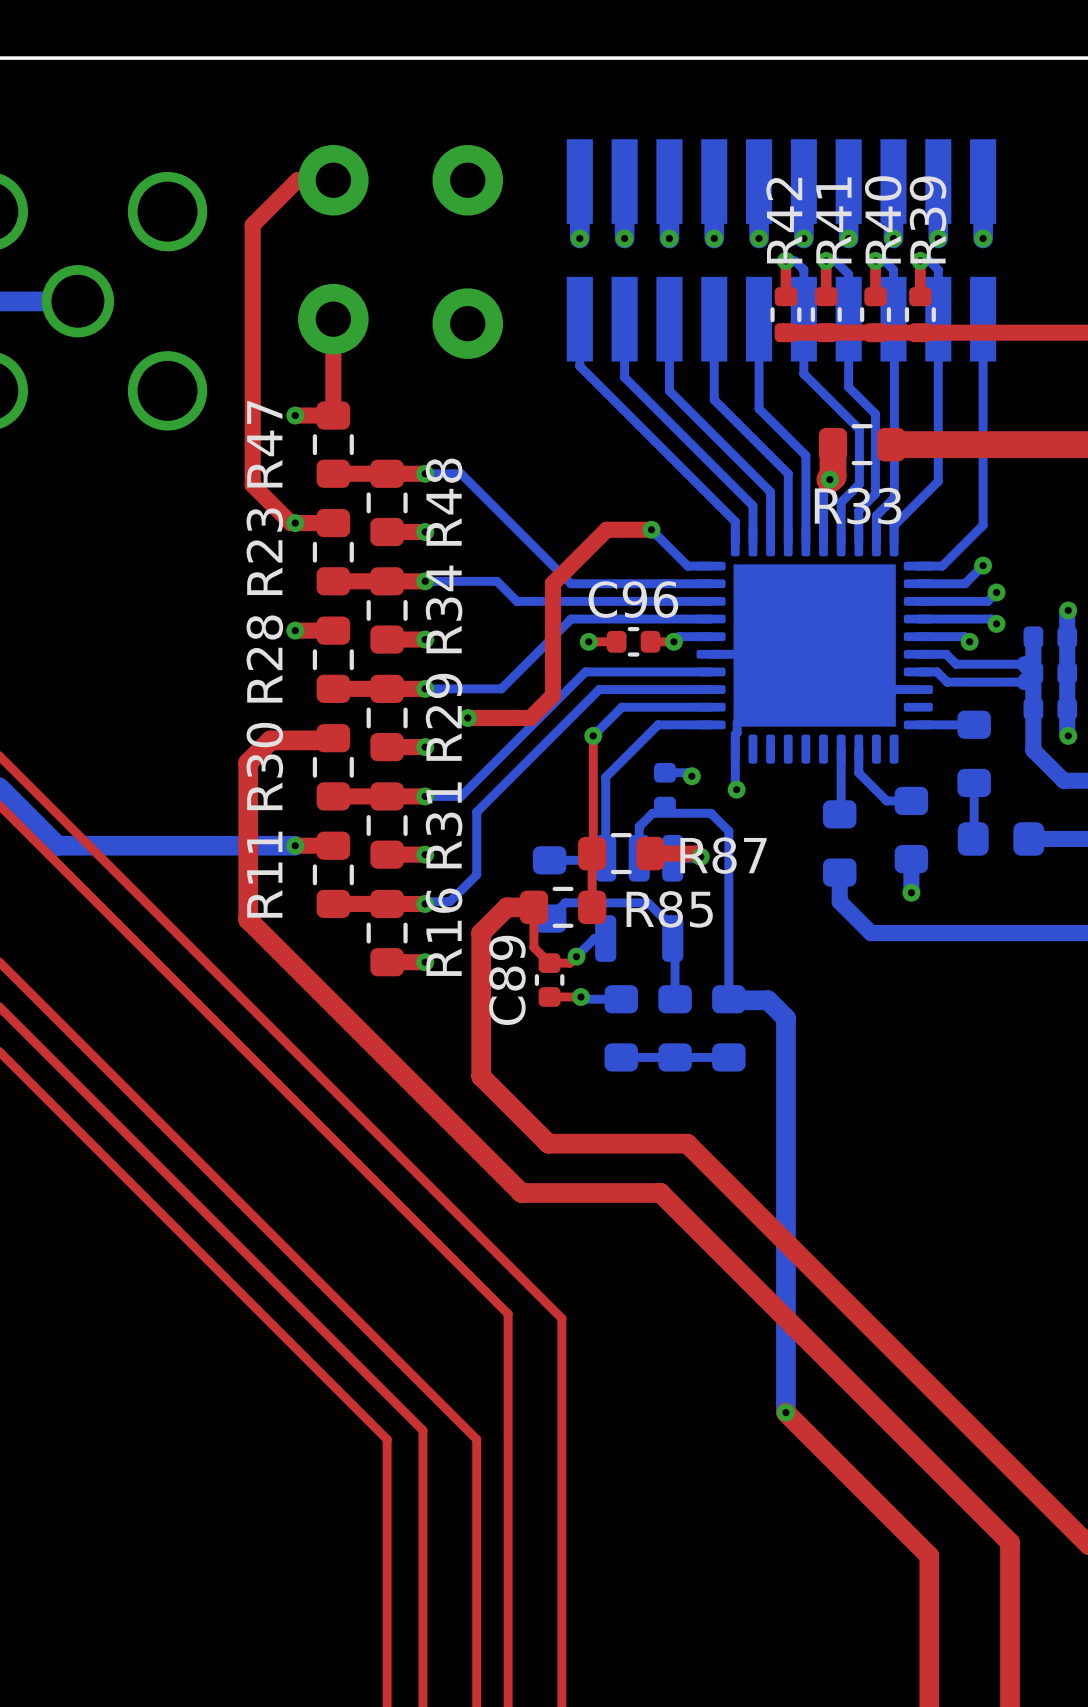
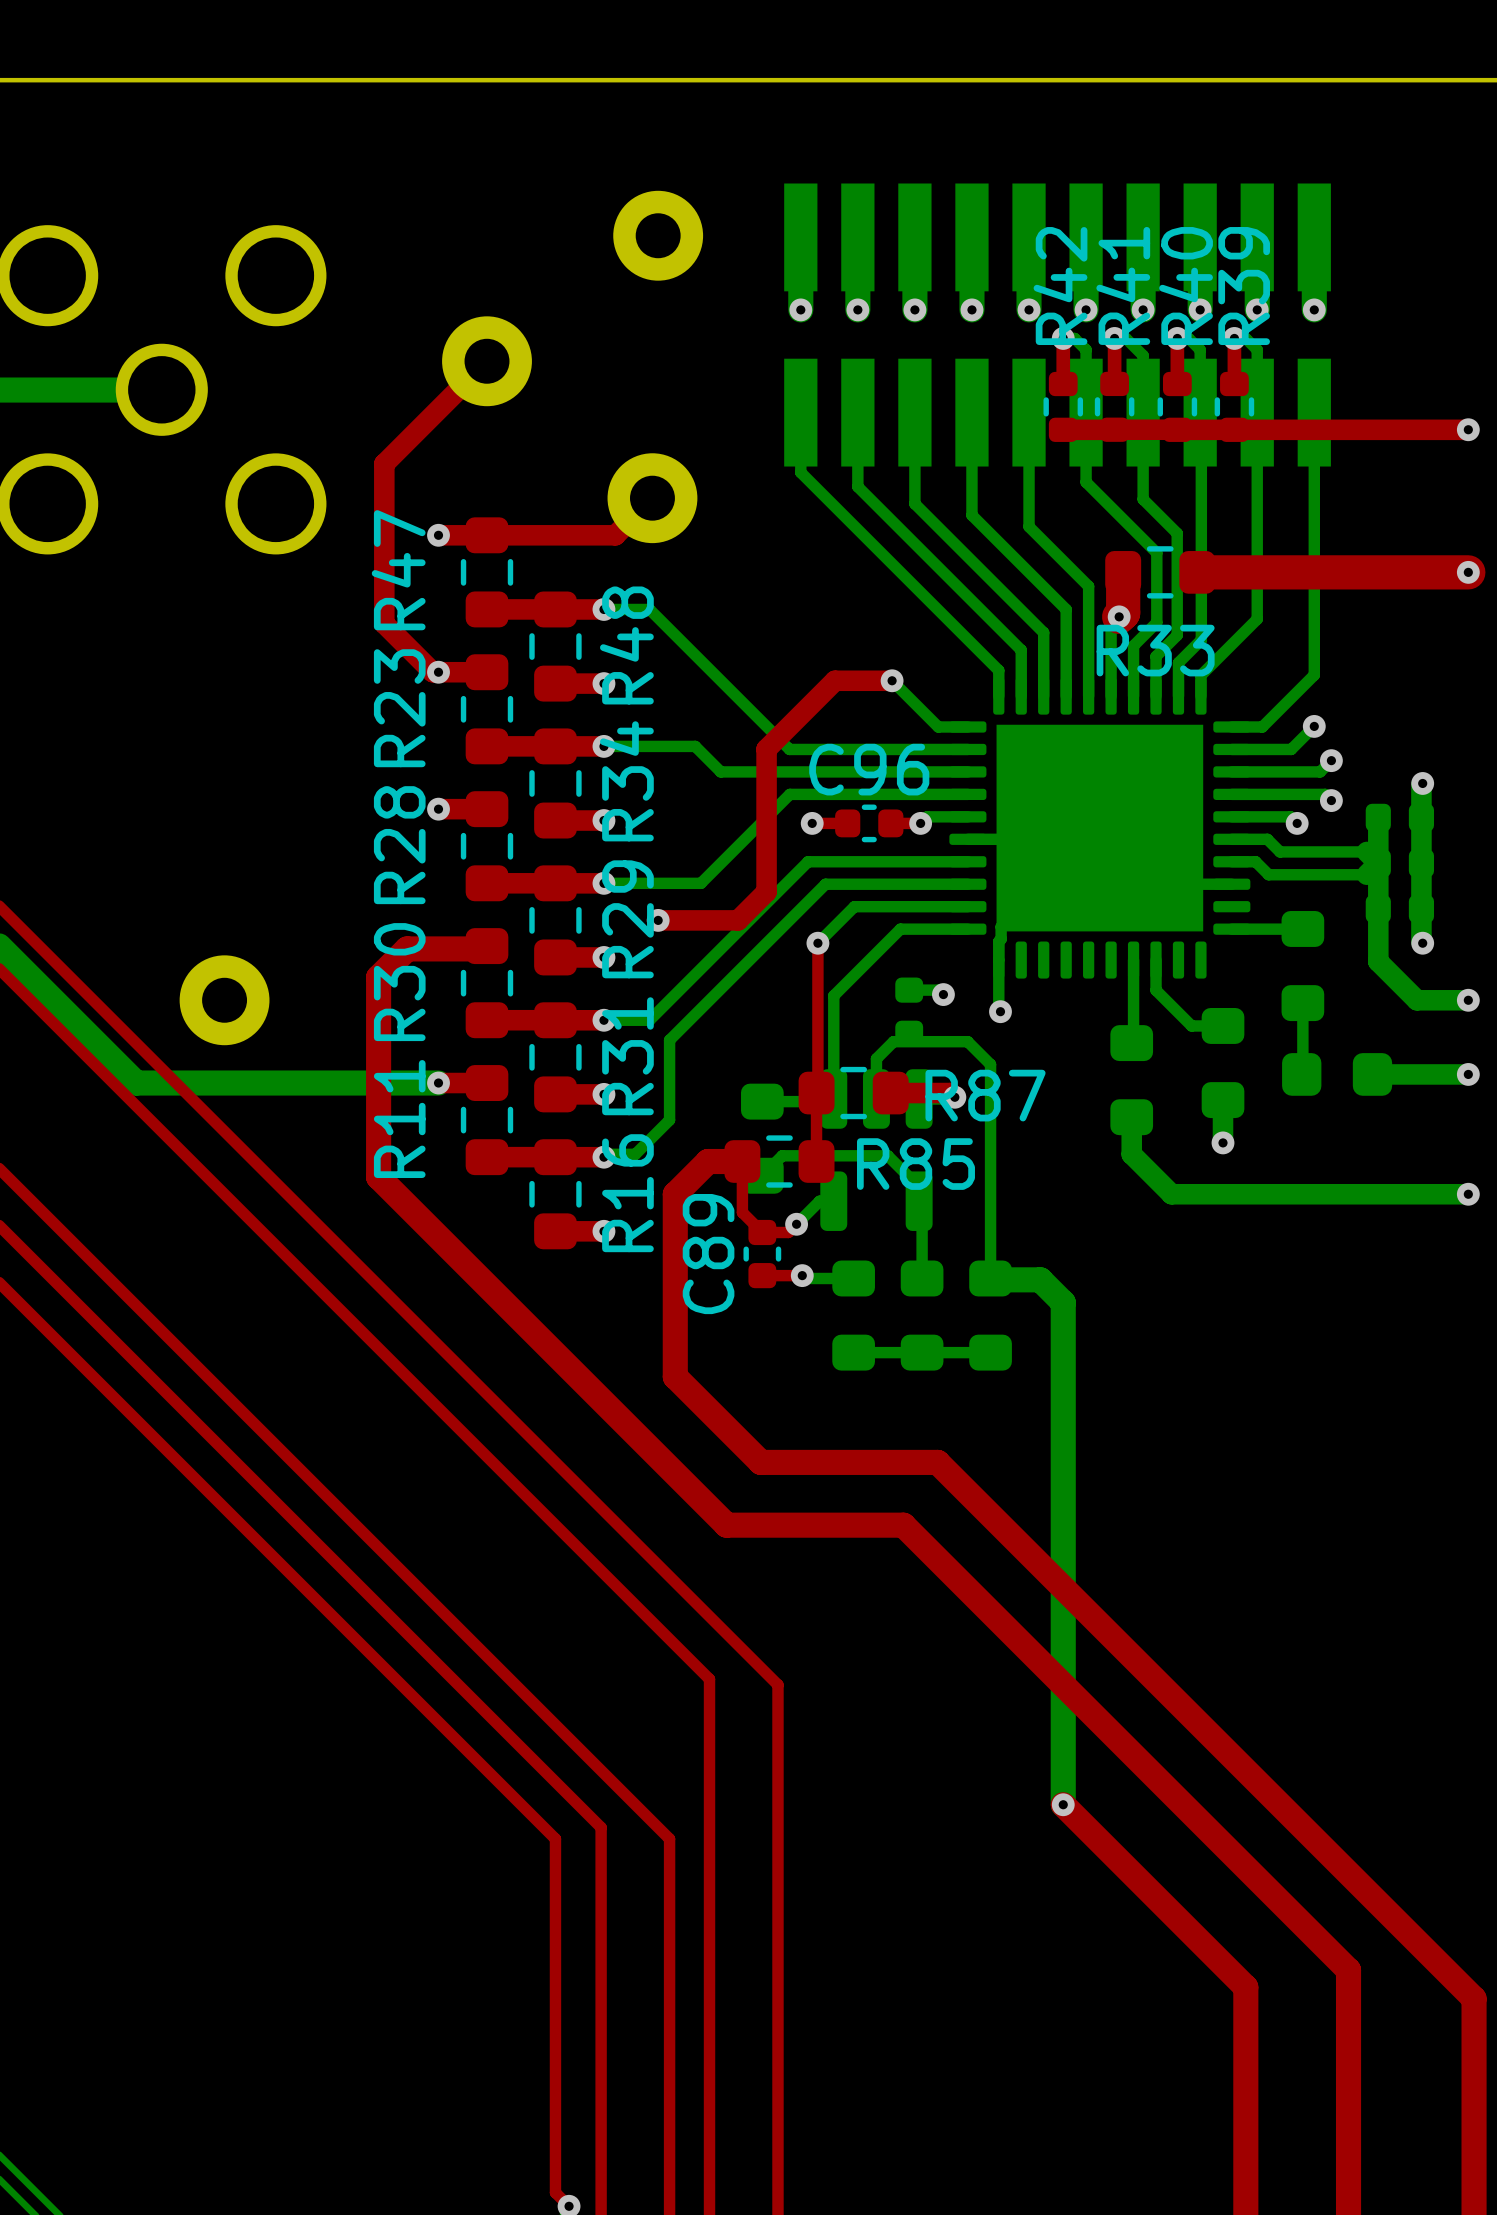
top track: (333, 180) (297, 180) (252, 225) (252, 359) -> (487, 361) (384, 463)
part: (333, 180) -> none
top track: (333, 319) (333, 415) -> (652, 498) (615, 535) (487, 535)
part position: (333, 319) -> (487, 361)
part position: (467, 323) -> (652, 498)
part: none -> (224, 1000)

